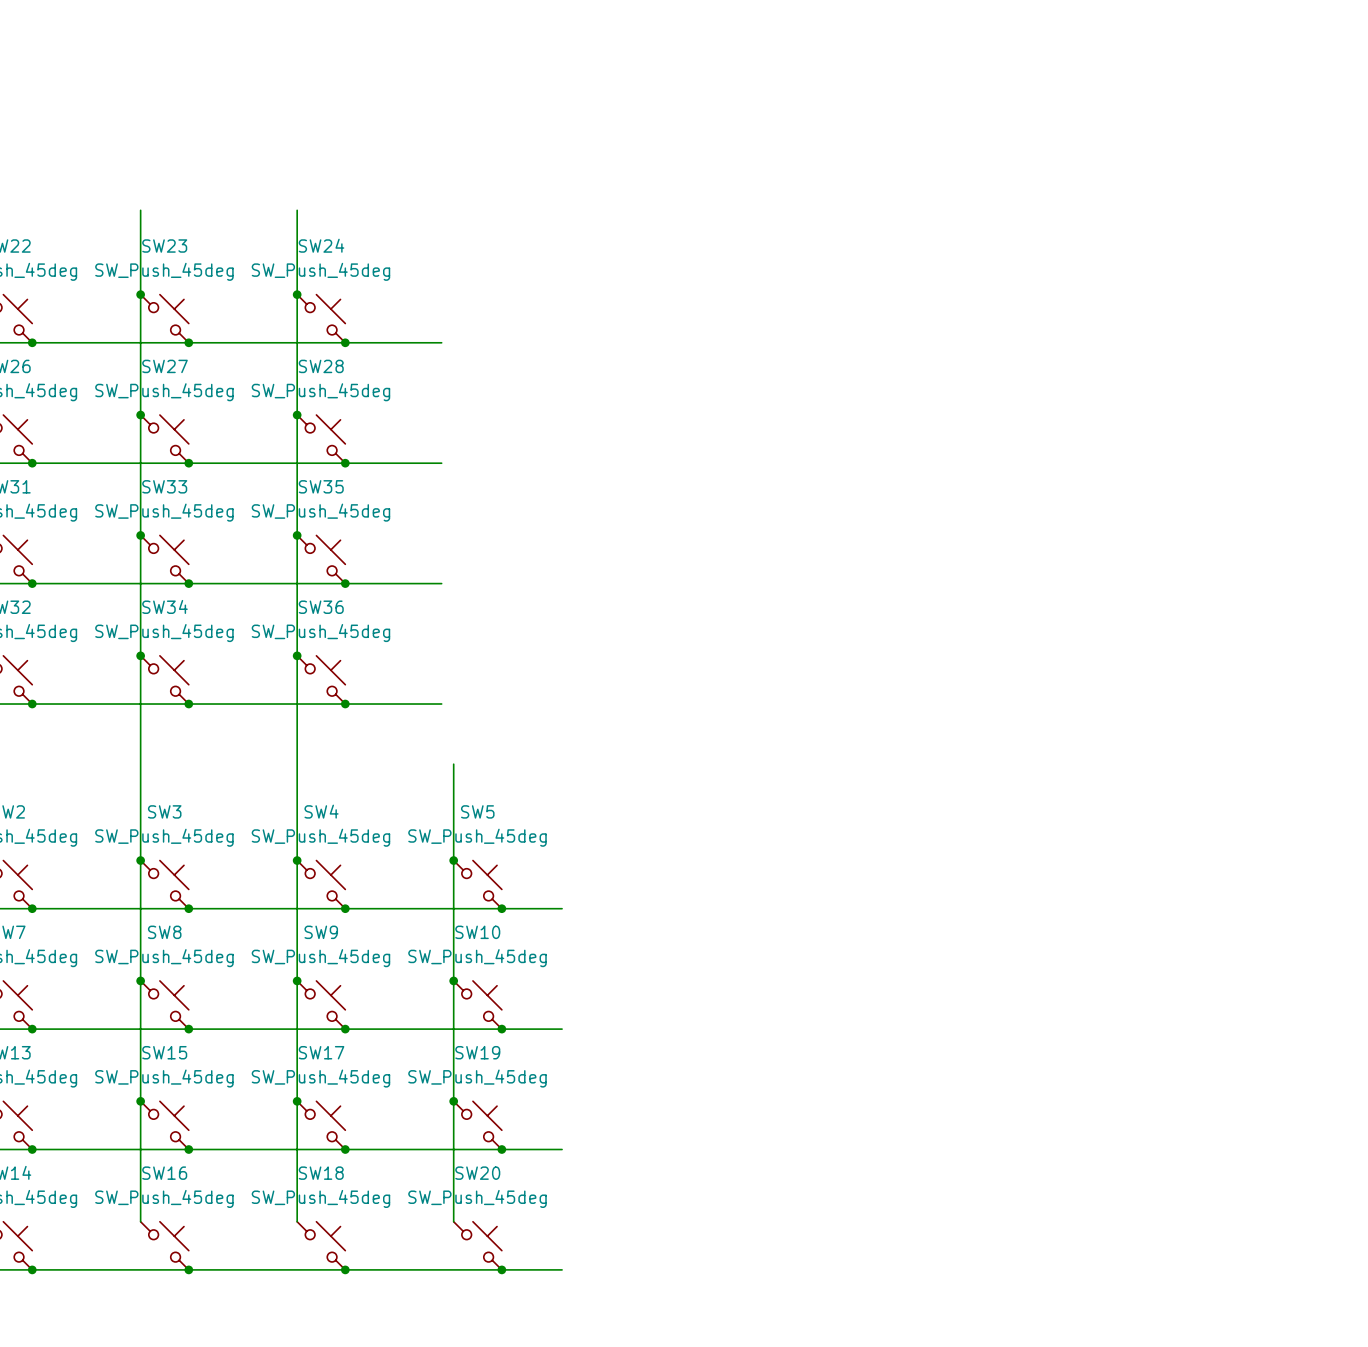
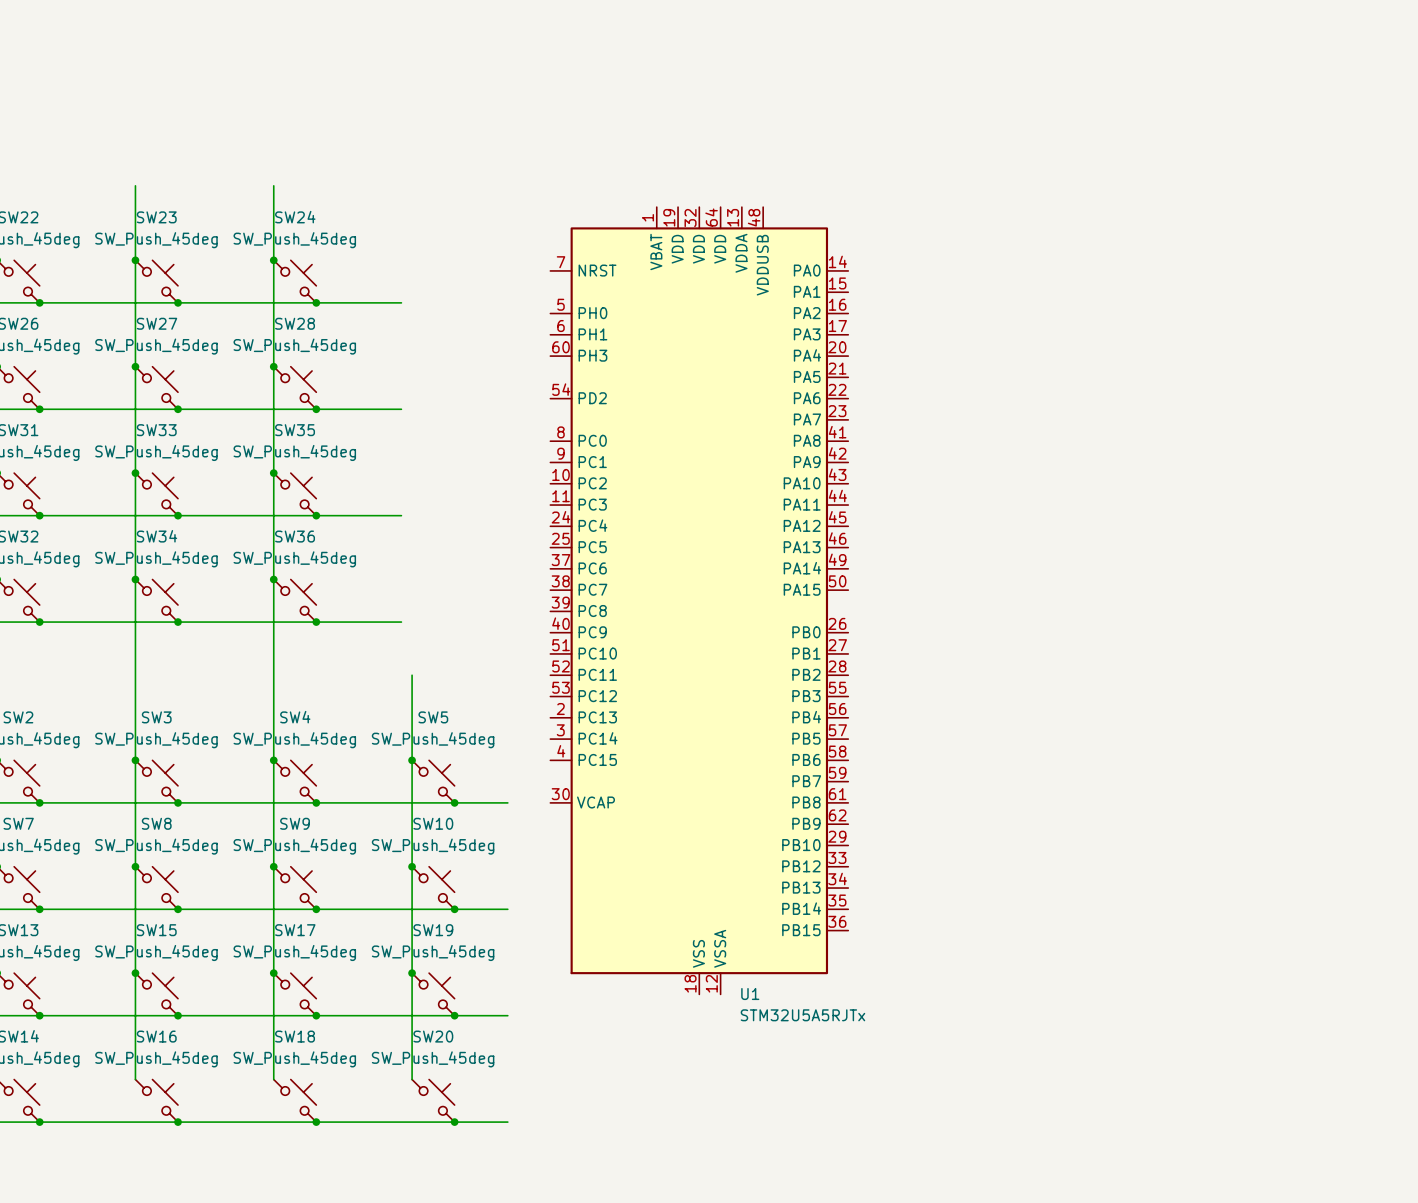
U1: none -> STM32U5A5RJTx (699, 600)

